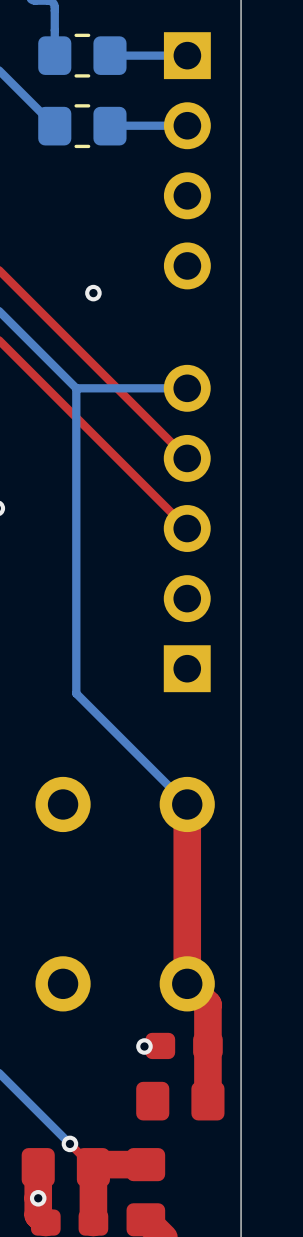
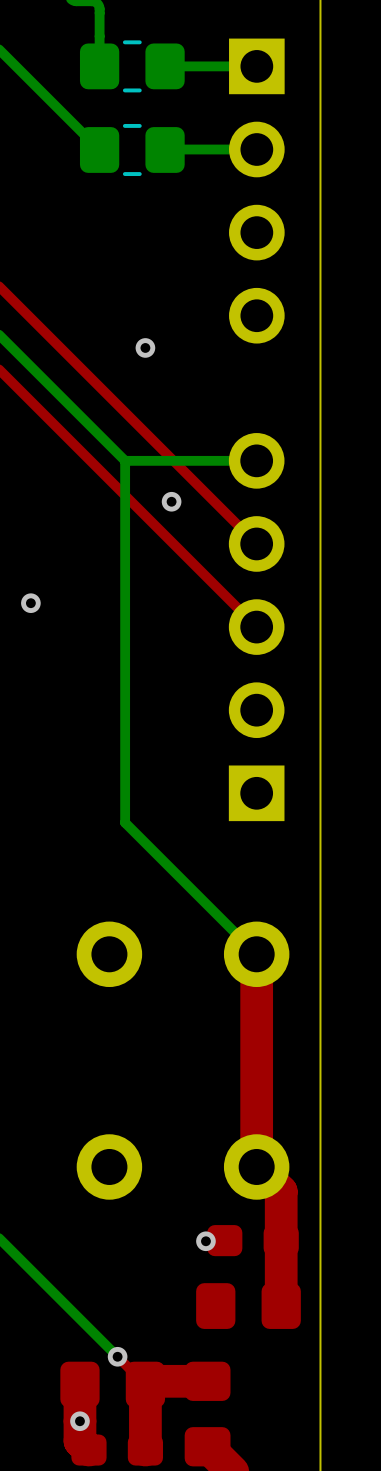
via: none -> (171, 501)

